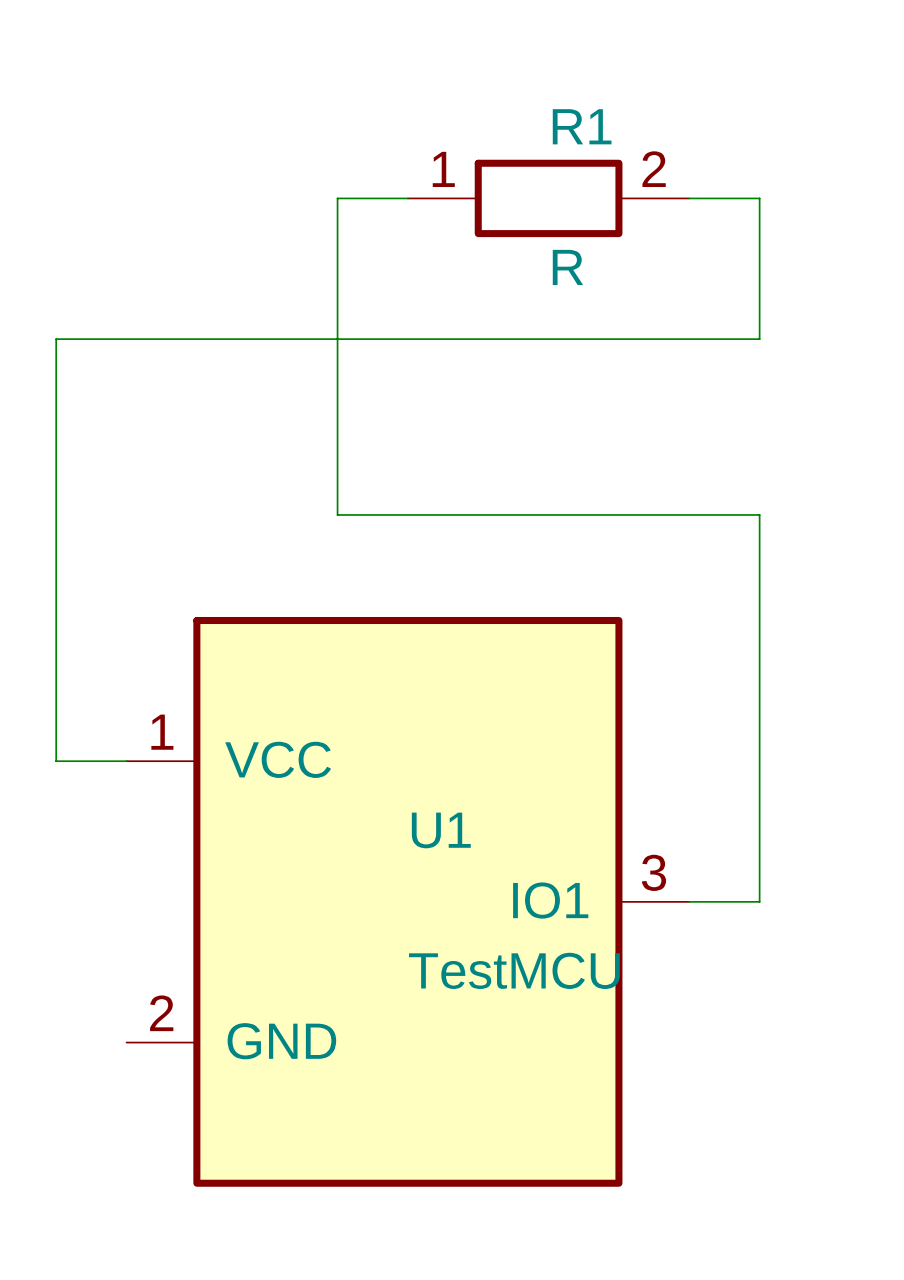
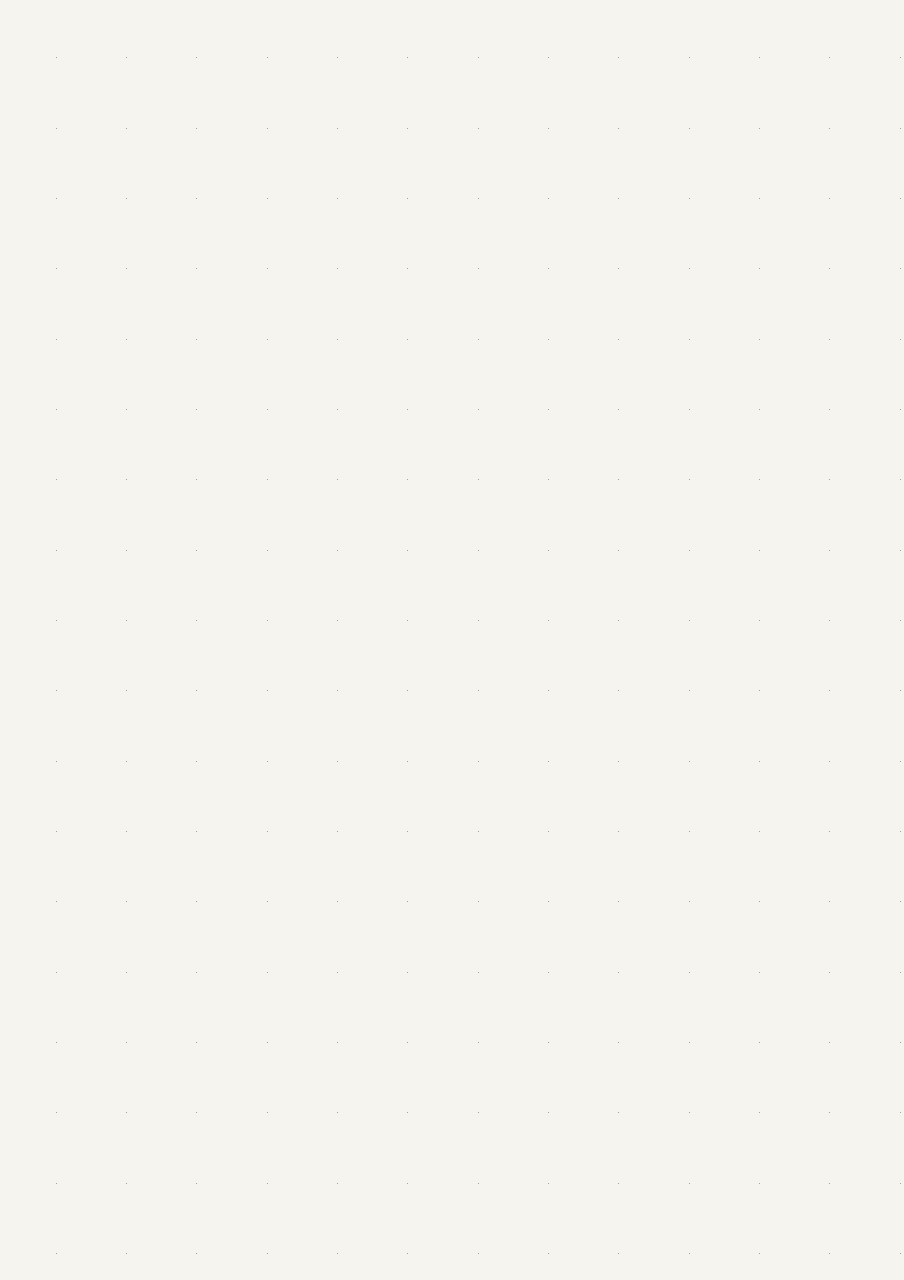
wire: (407, 198) (337, 198) (337, 514) (759, 514) (759, 901) (689, 901) -> none
R1: R (548, 198) -> none
wire: (689, 198) (759, 198) (759, 339) (56, 339) (56, 761) (126, 761) -> none
U1: TestMCU (407, 901) -> none

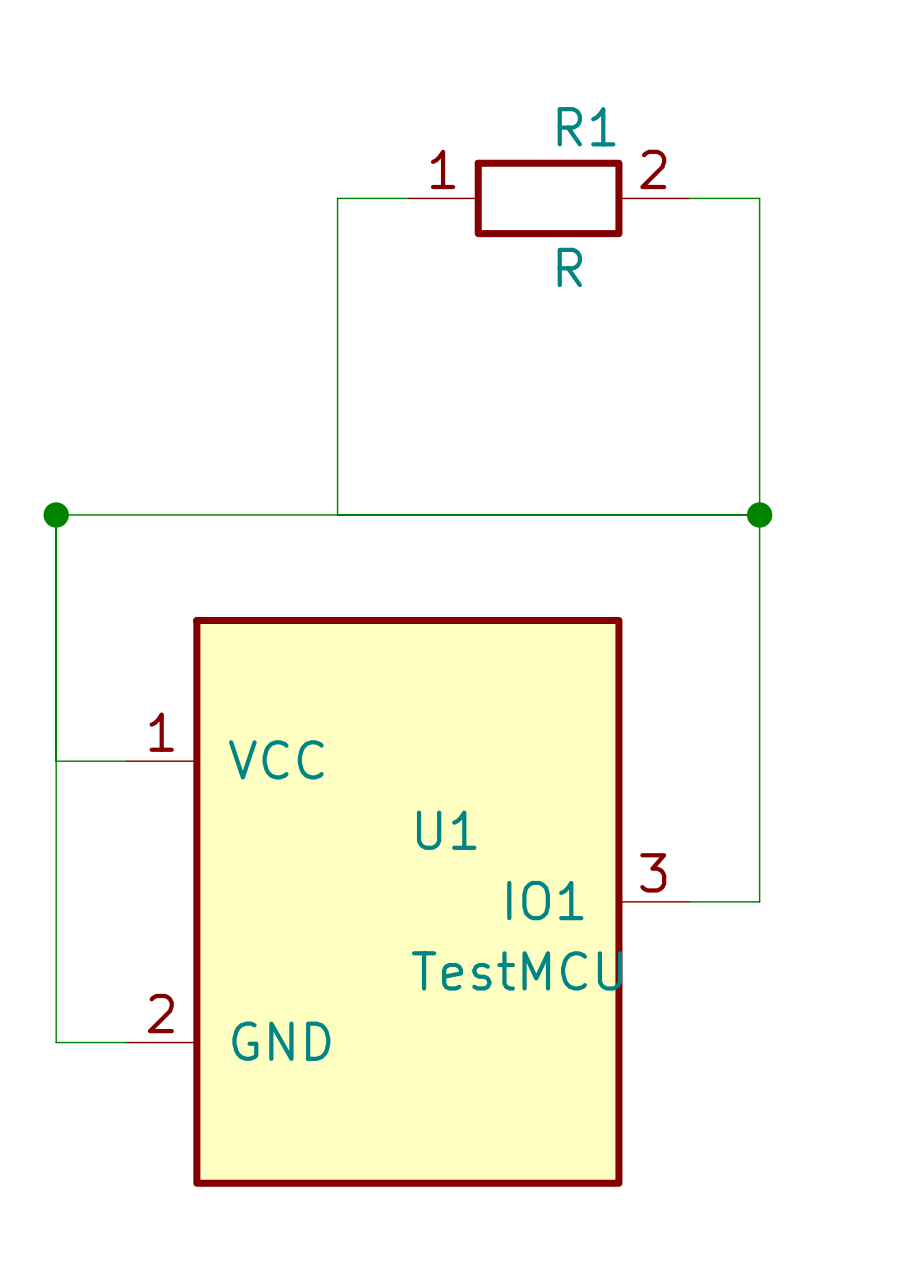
wire: none -> (407, 198) (337, 198) (337, 514)
R1: none -> R (548, 198)
wire: none -> (689, 198) (759, 198) (759, 901) (689, 901)
junction: none -> (56, 514)
wire: none -> (759, 514) (56, 514) (56, 1042) (126, 1042)
junction: none -> (759, 514)
wire: none -> (56, 761) (126, 761)
U1: none -> TestMCU (407, 901)

